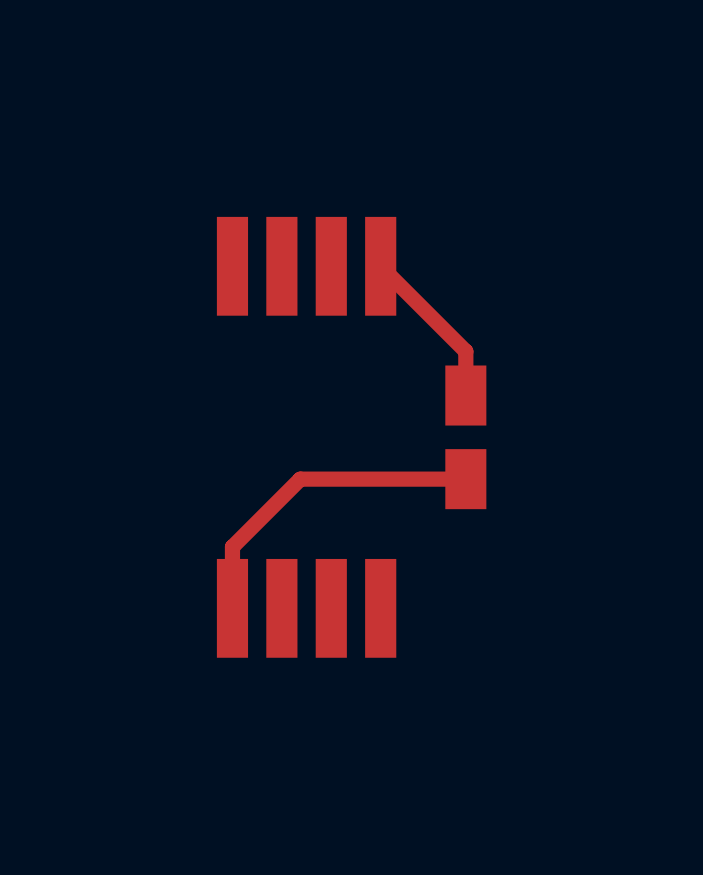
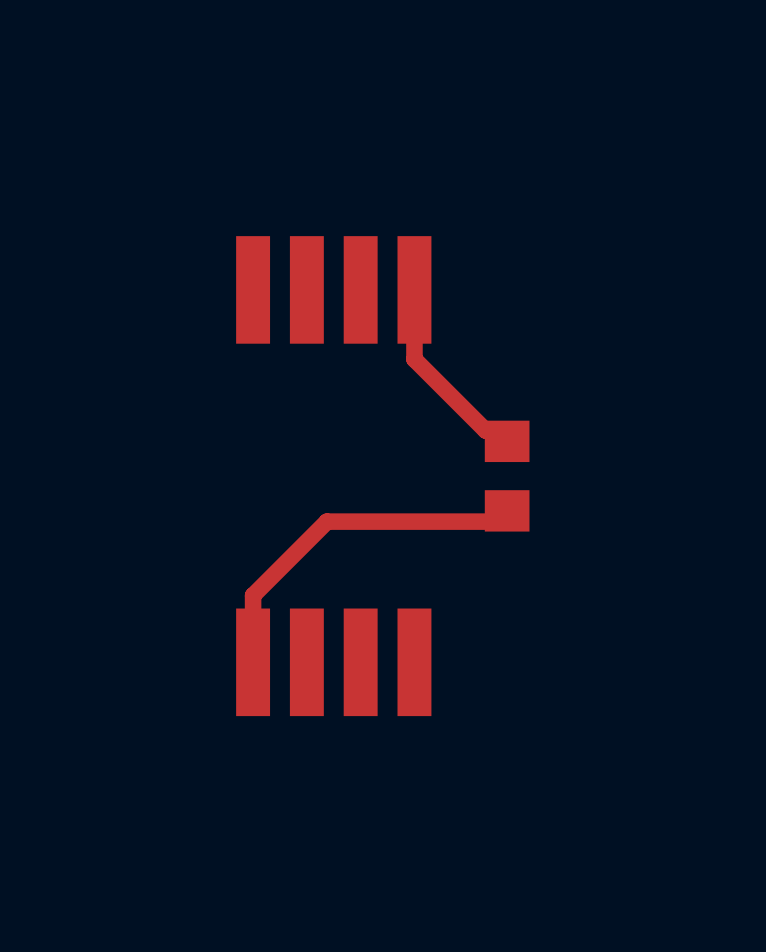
top track: (380, 266) (465, 351) (465, 395) -> (414, 289) (414, 359) (485, 430) (507, 430)
part footprint: [445, 365, 487, 510] -> [484, 420, 530, 532]

